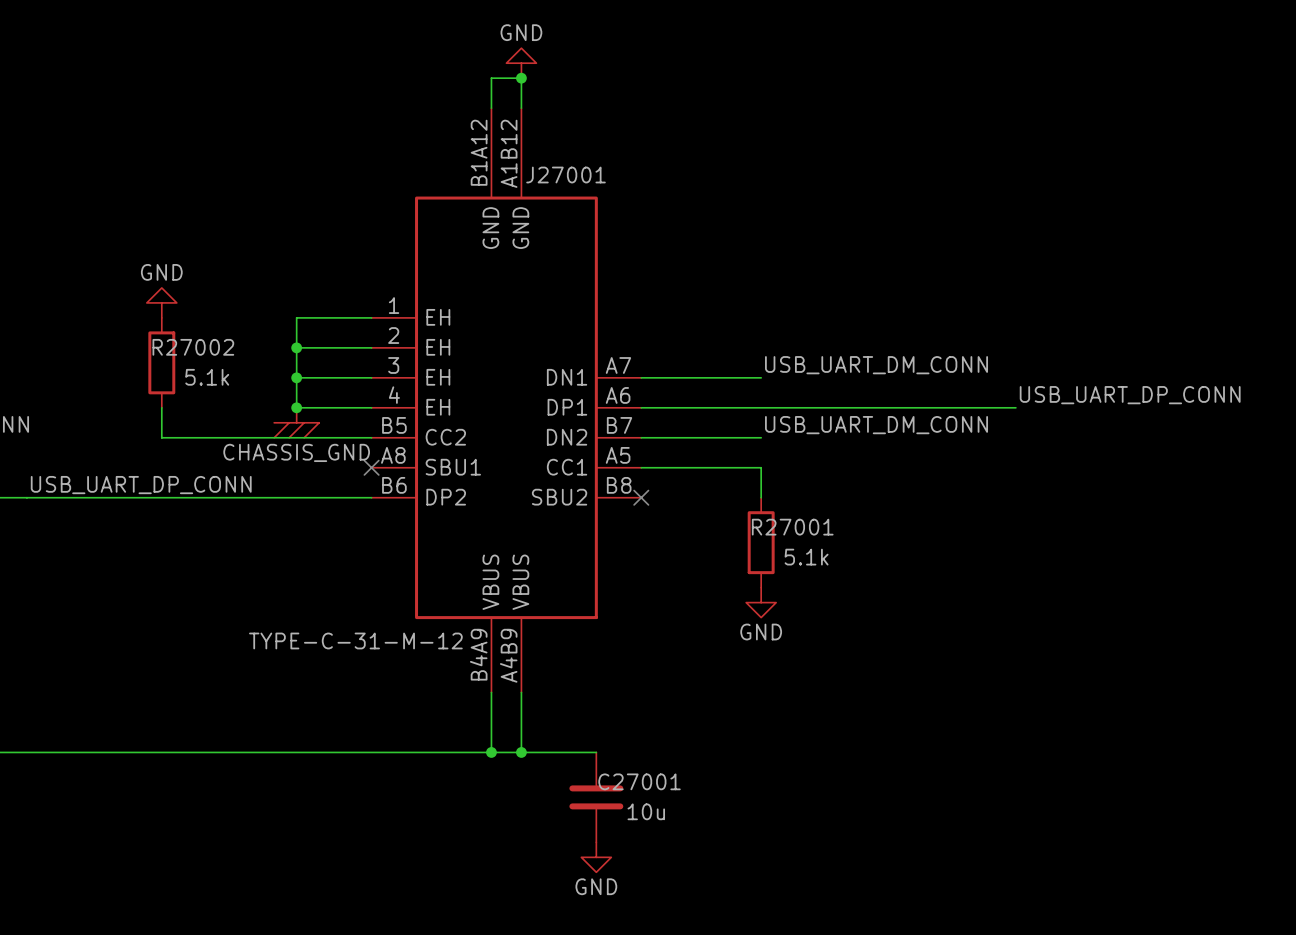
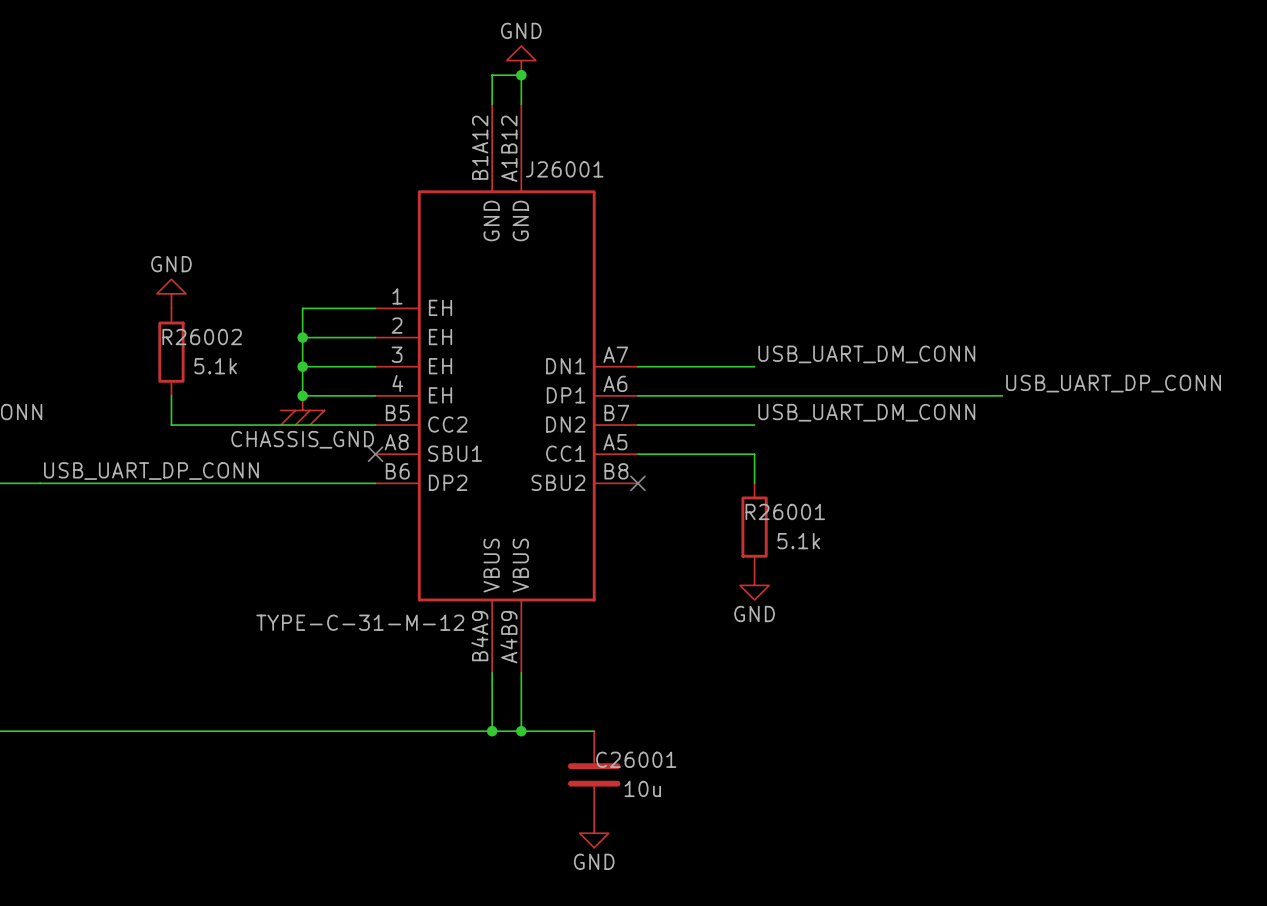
J27001 name: J27001 (566, 175) -> J26001 (564, 169)
R27002 name: R27002 (193, 347) -> R26002 (202, 337)
R27001 name: R27001 (792, 527) -> R26001 (785, 511)
C27001 name: C27001 (639, 781) -> C26001 (636, 759)

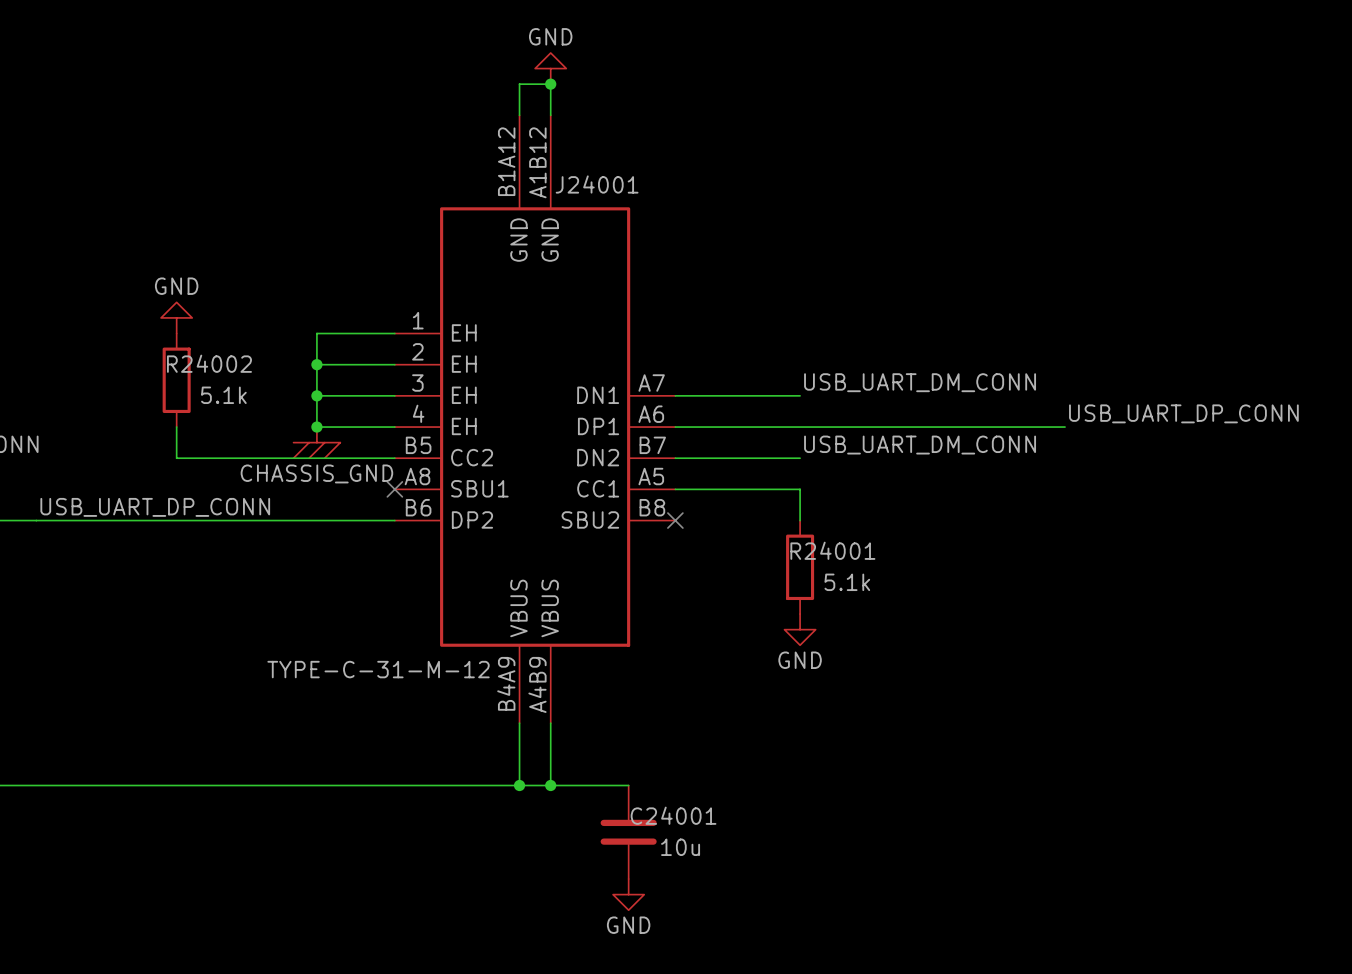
J26001 name: J26001 (564, 169) -> J24001 (597, 184)
R26002 name: R26002 (202, 337) -> R24002 (209, 363)
R26001 name: R26001 (785, 511) -> R24001 (832, 550)
C26001 name: C26001 (636, 759) -> C24001 (673, 815)

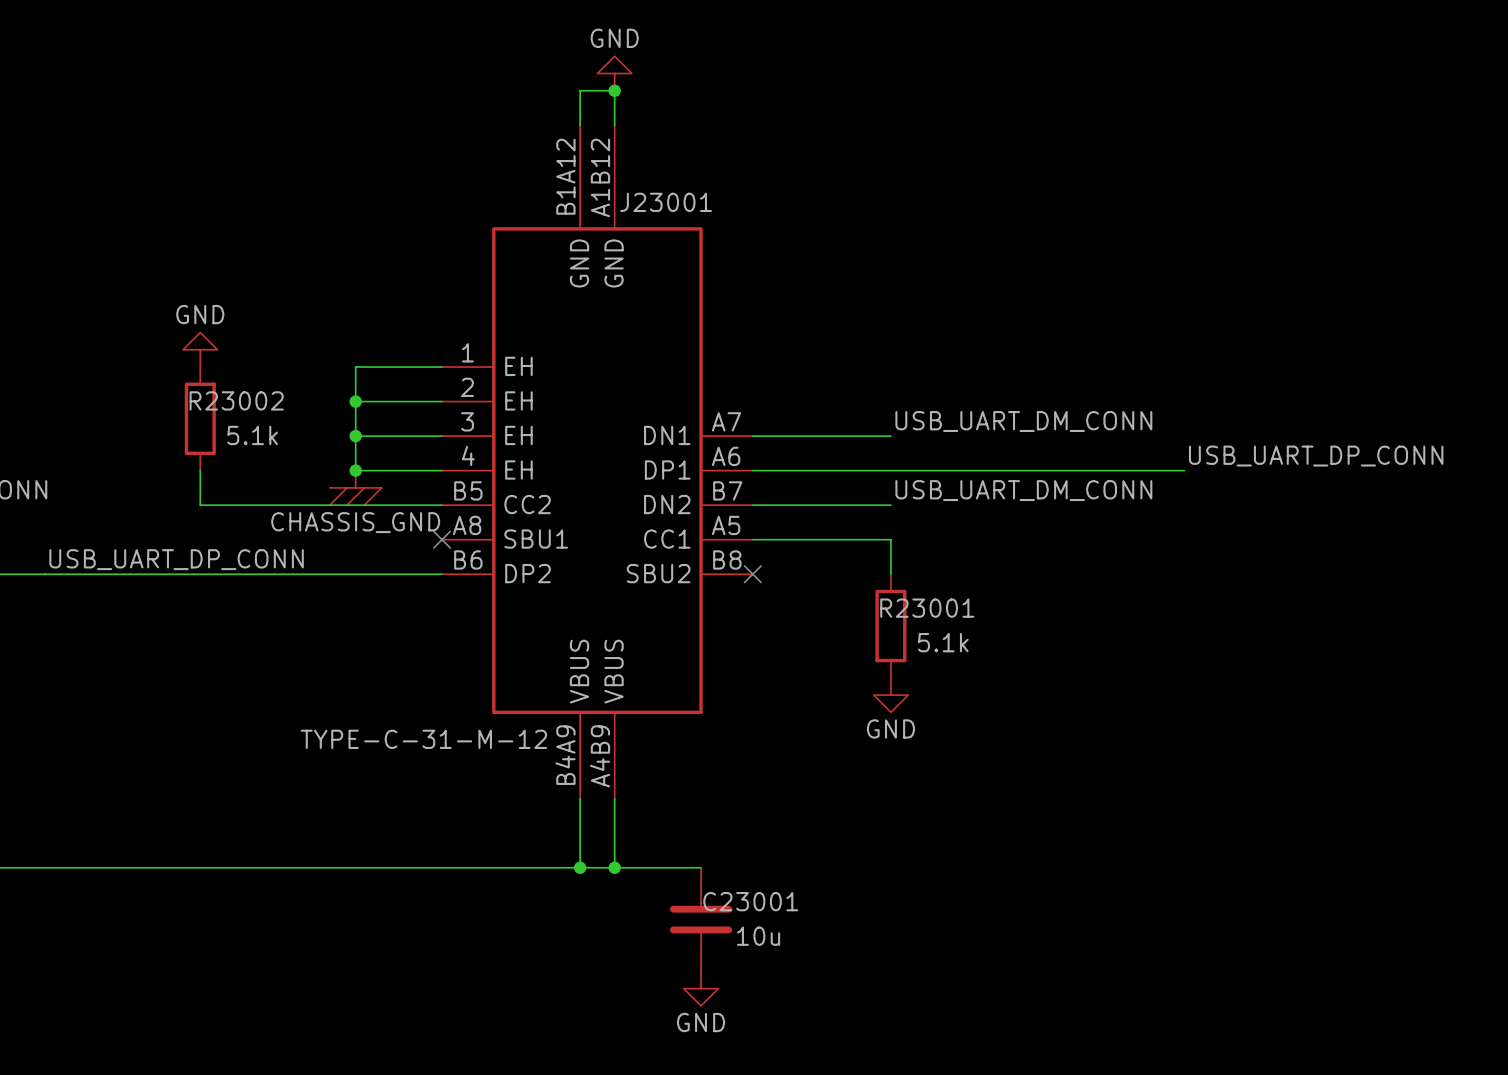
J24001 name: J24001 (597, 184) -> J23001 (666, 202)
R24002 name: R24002 (209, 363) -> R23002 (236, 400)
R24001 name: R24001 (832, 550) -> R23001 (927, 608)
C24001 name: C24001 (673, 815) -> C23001 (750, 901)

